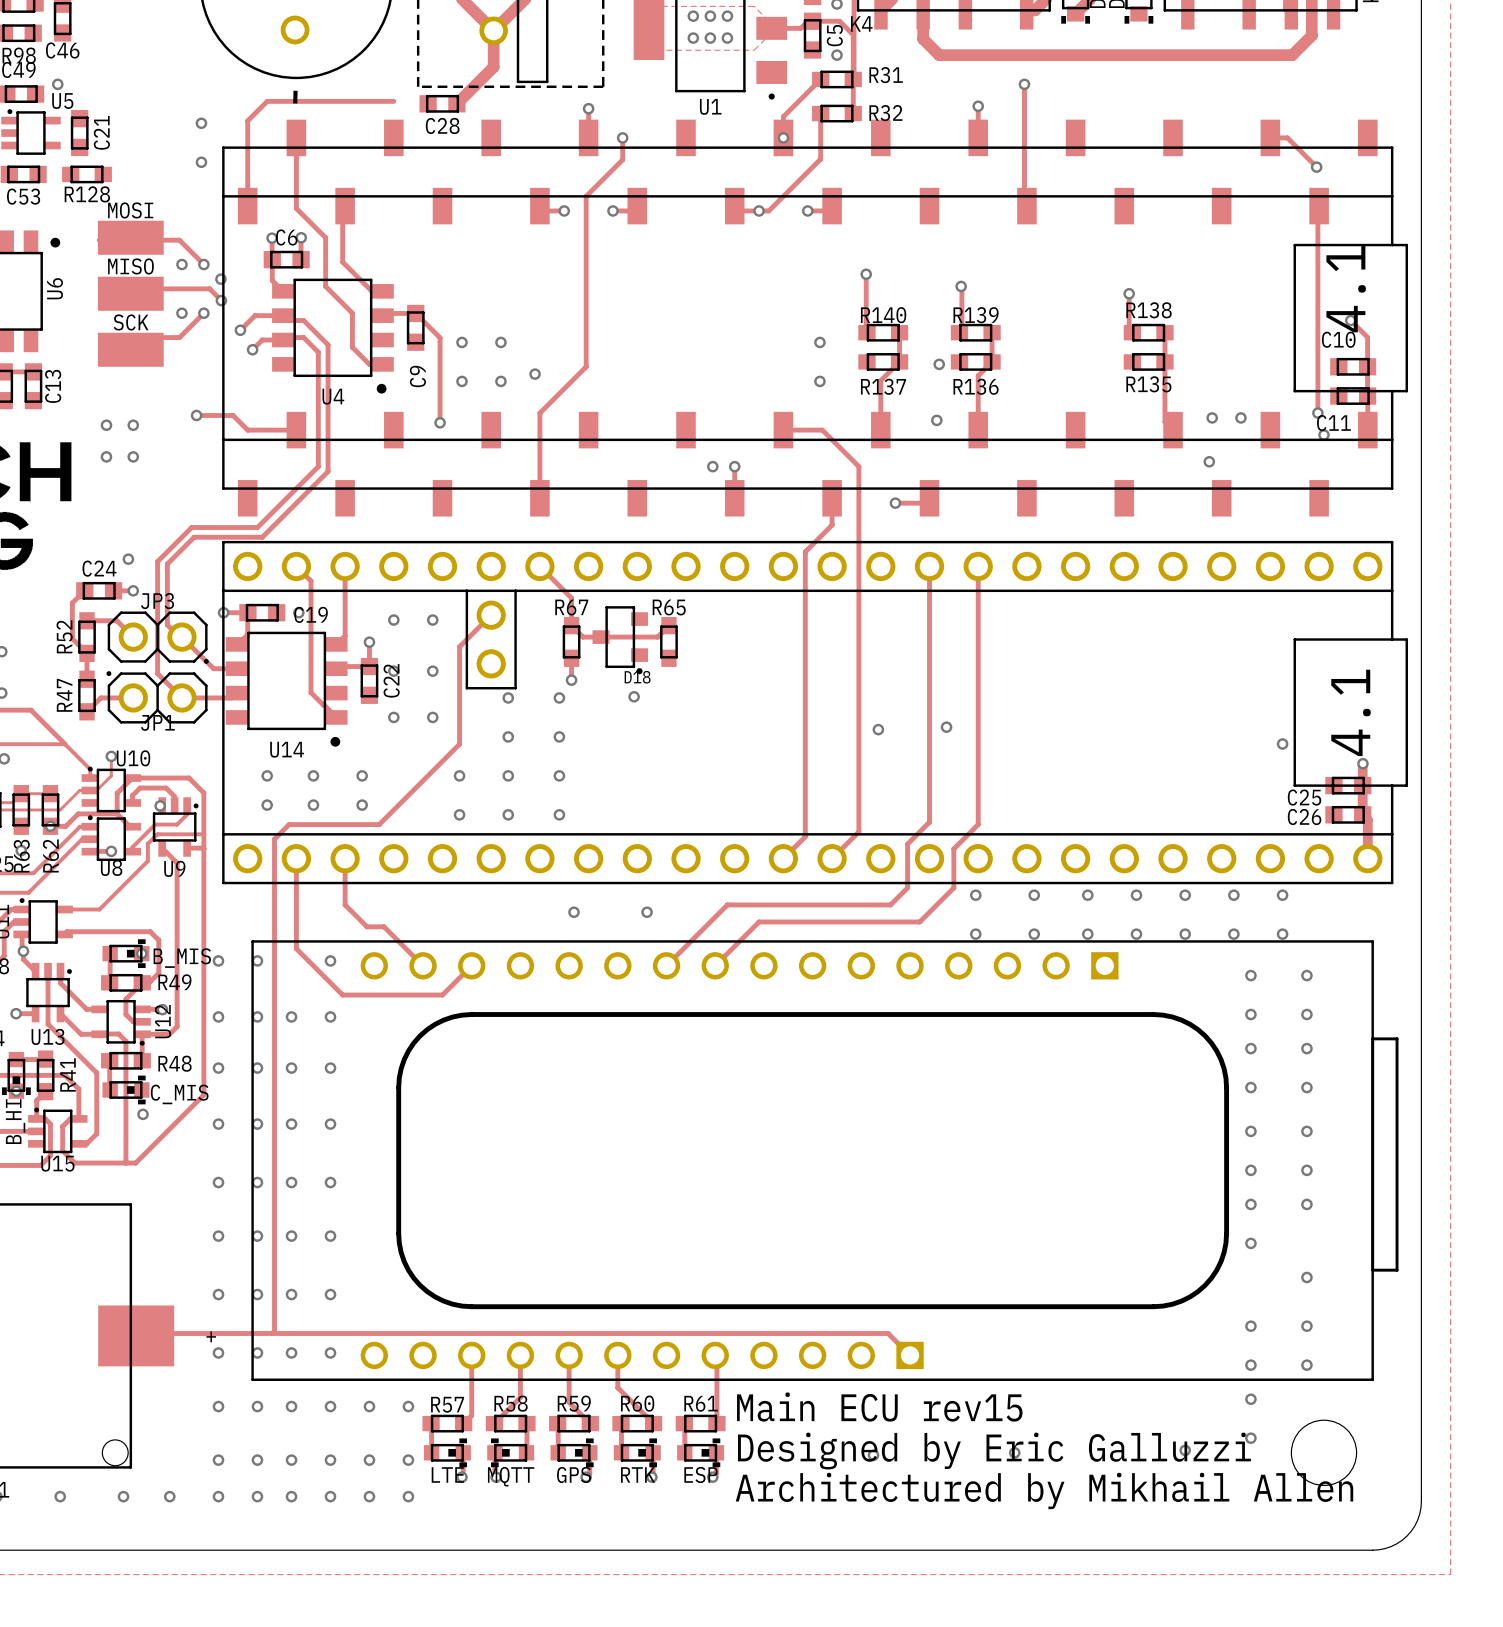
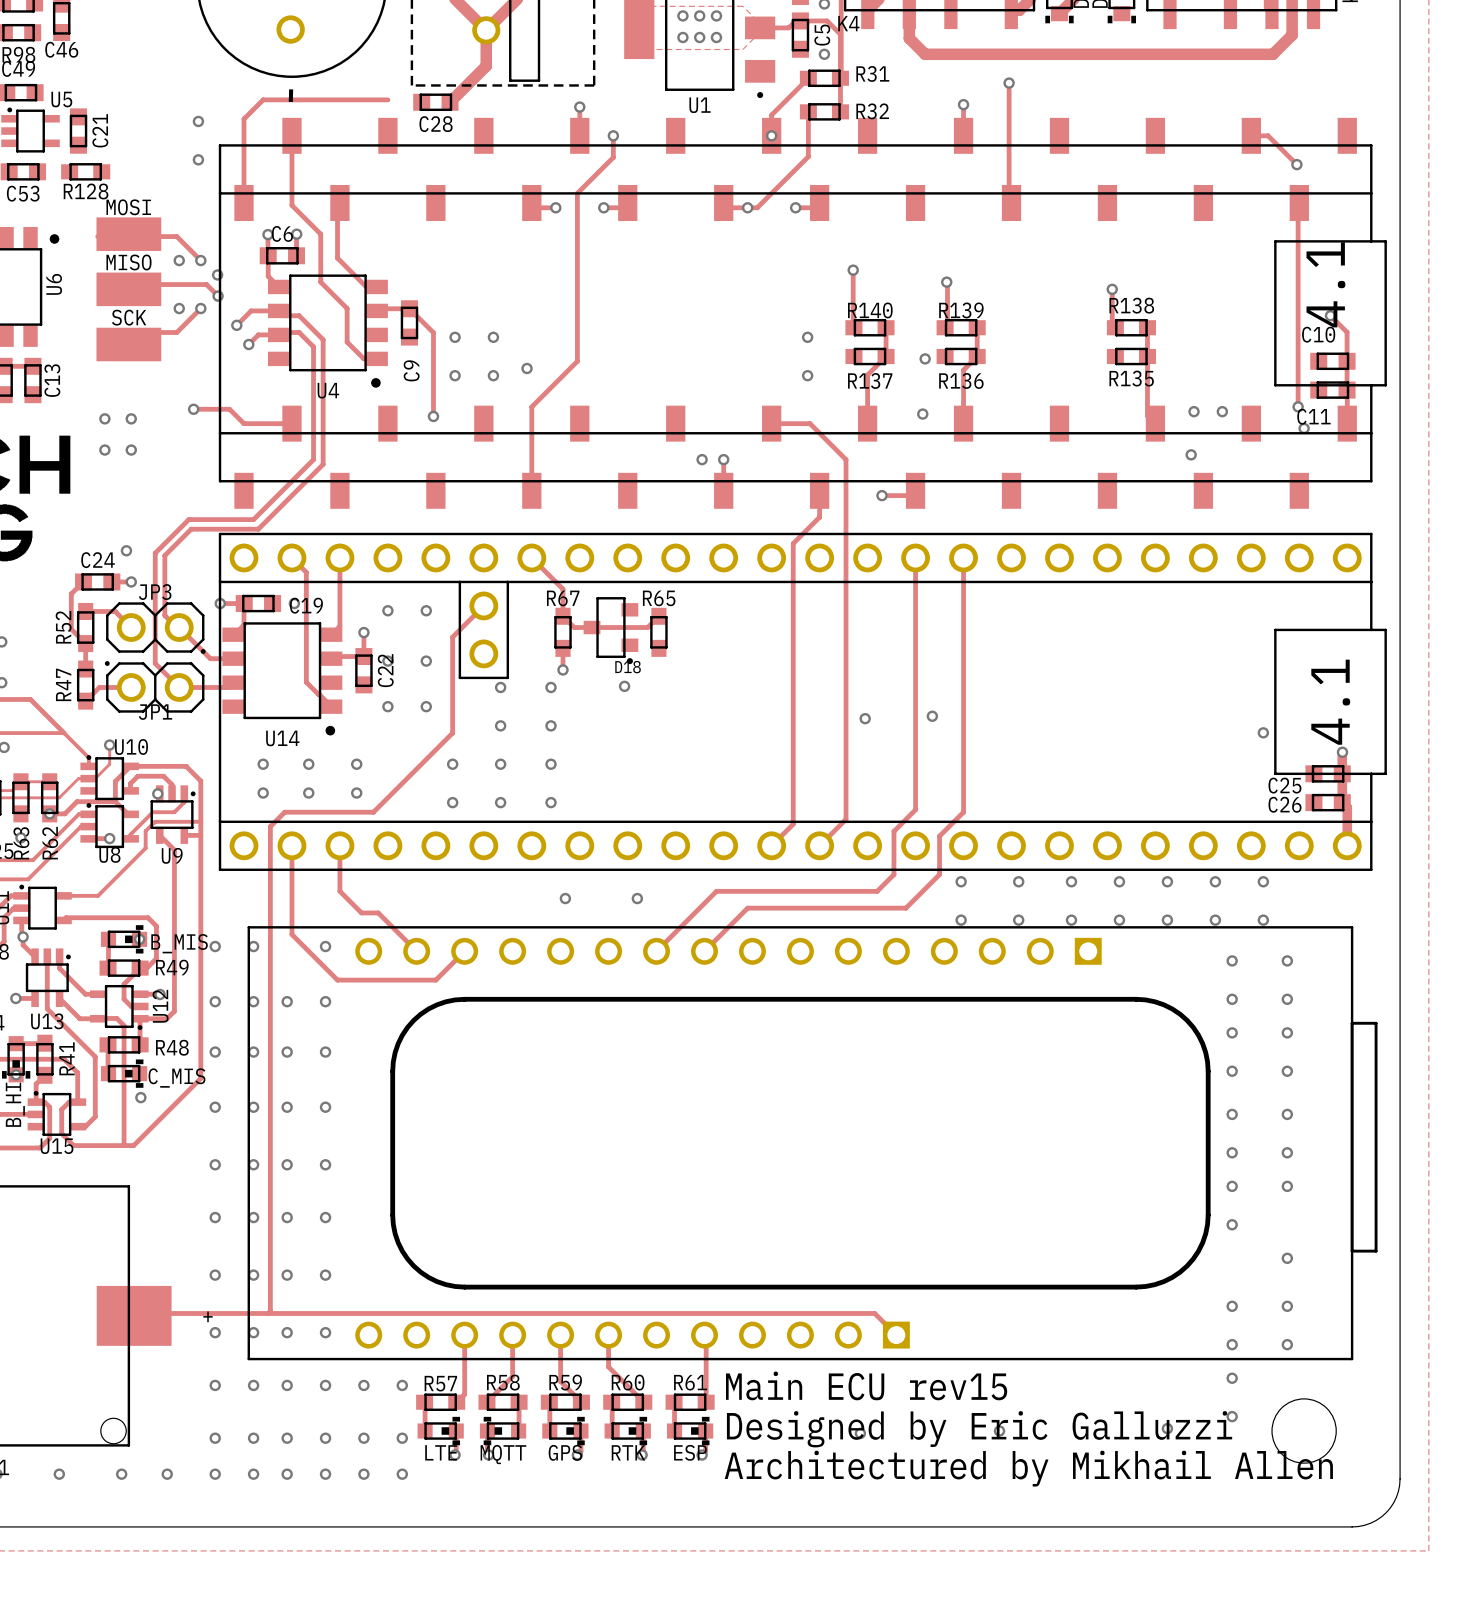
via: (57, 84) -> none

